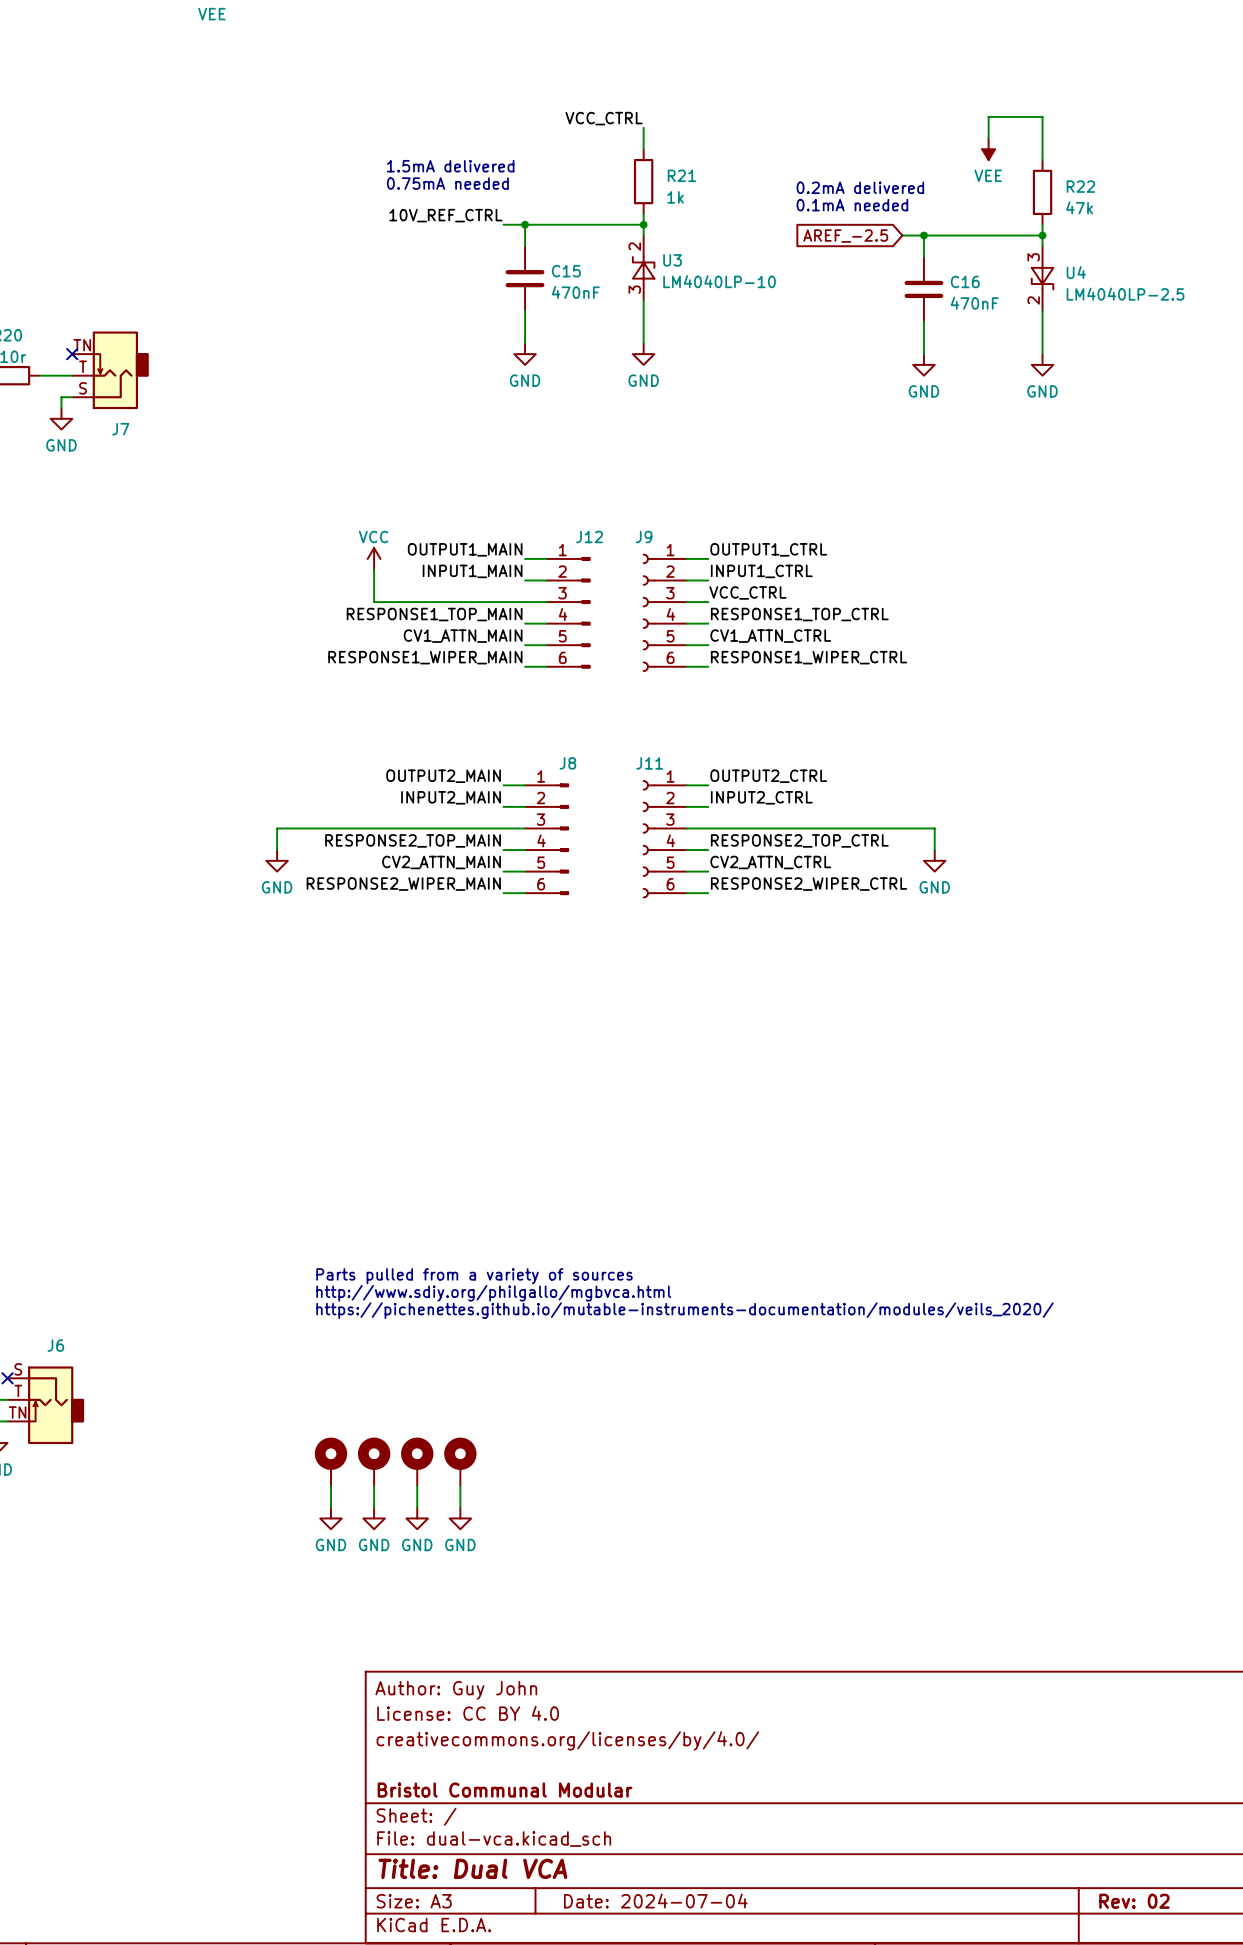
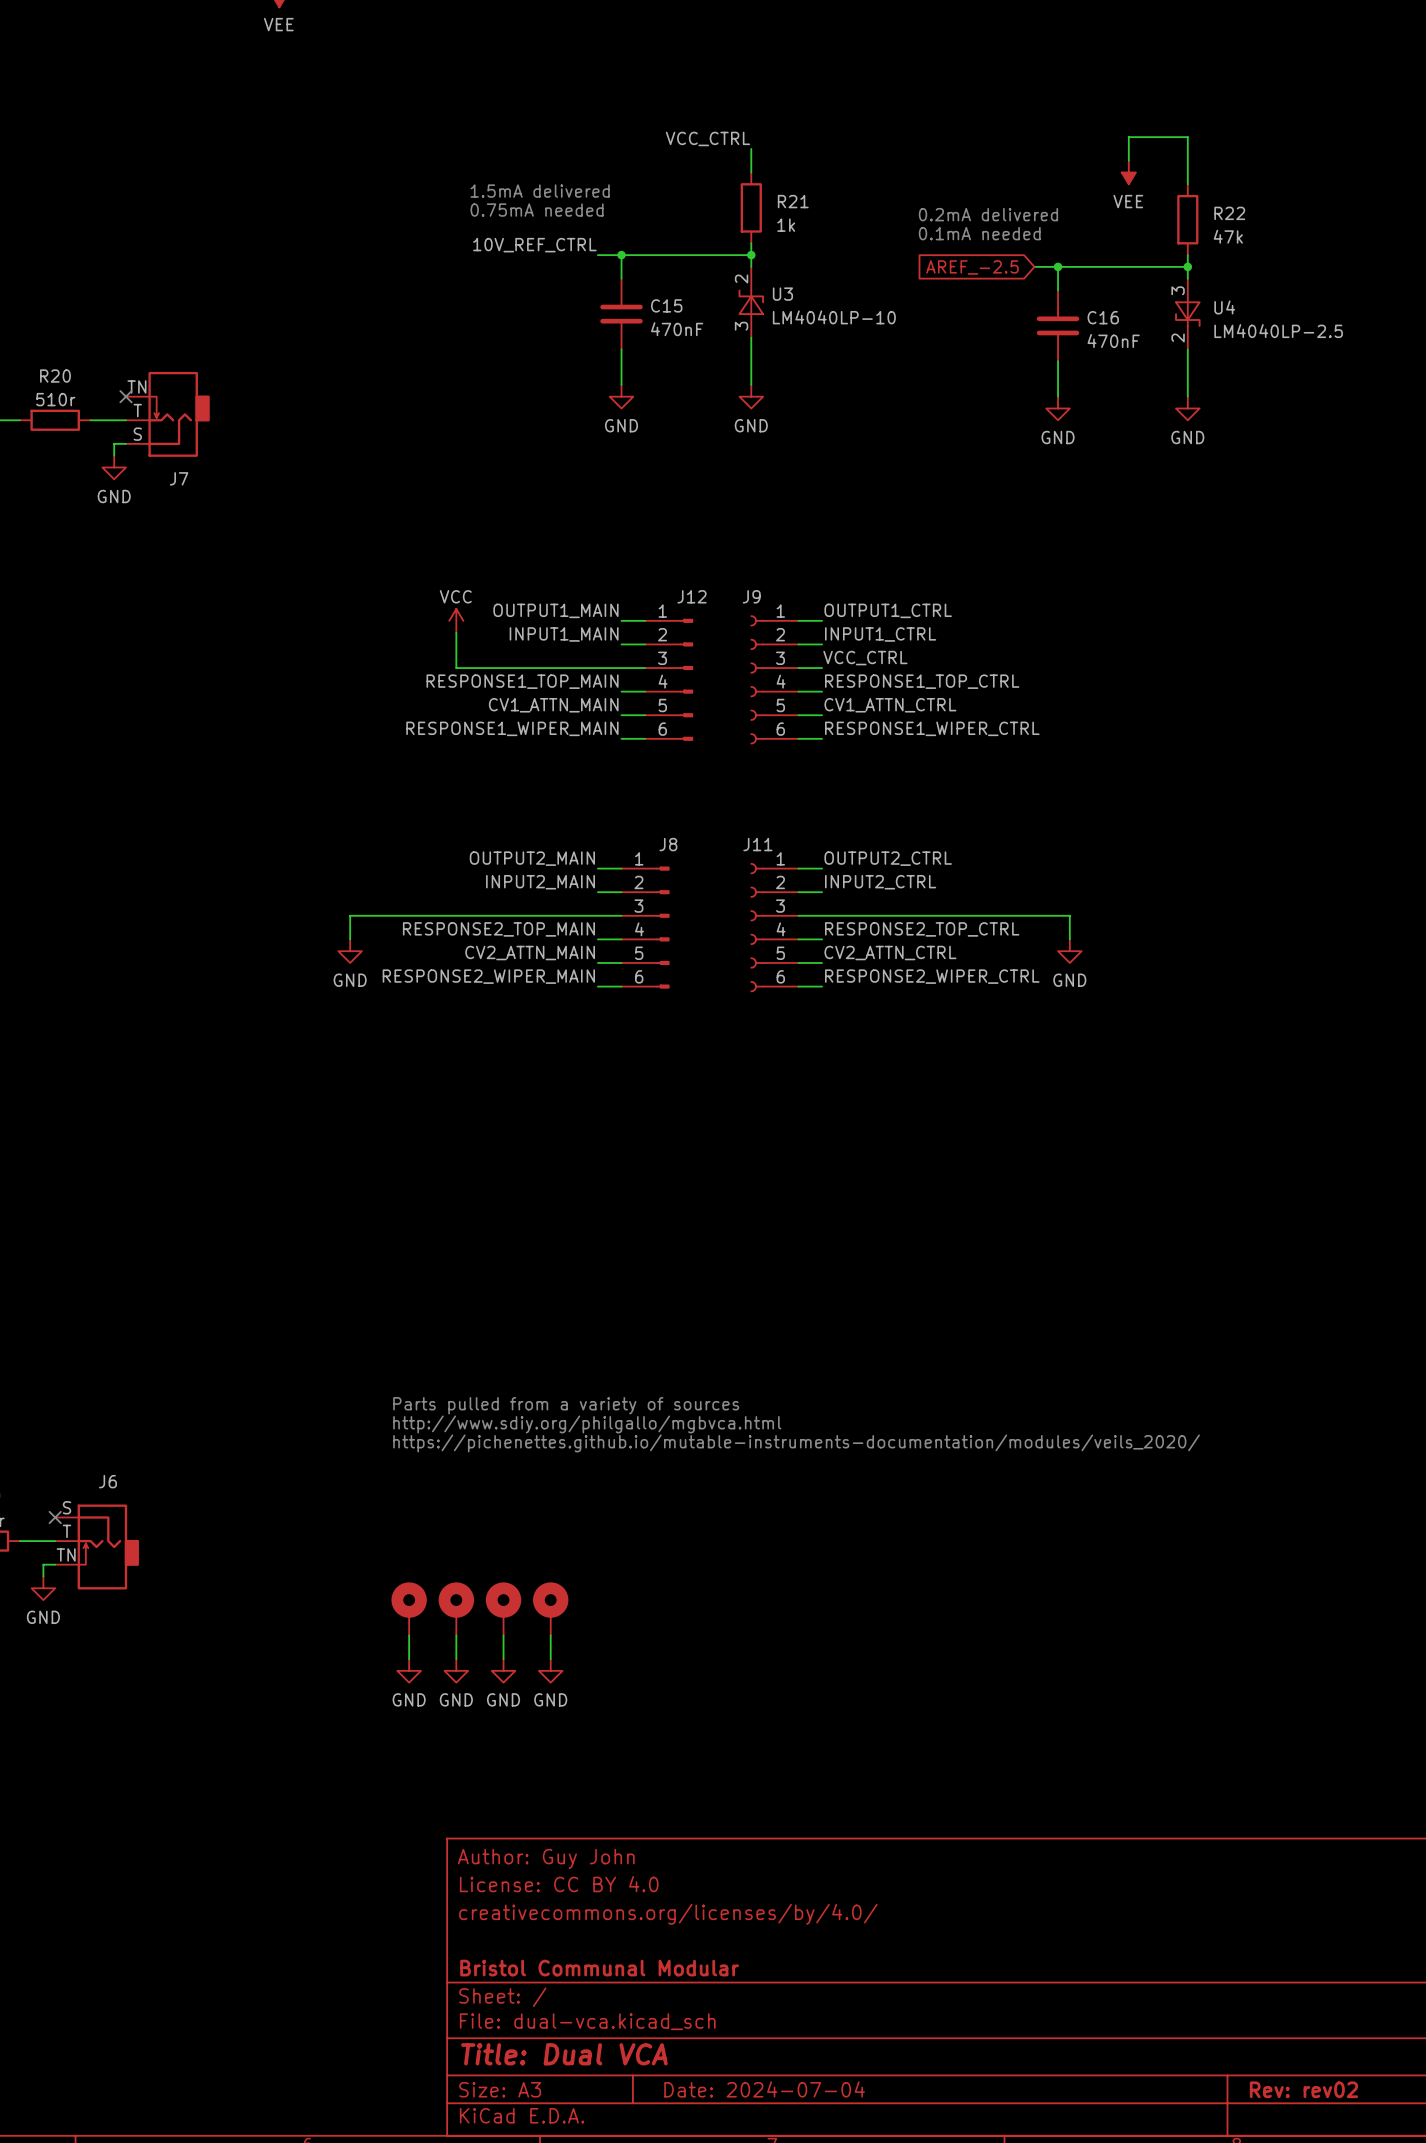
title block: Rev: 02 (1134, 1901) -> Rev: rev02 (1303, 2089)

